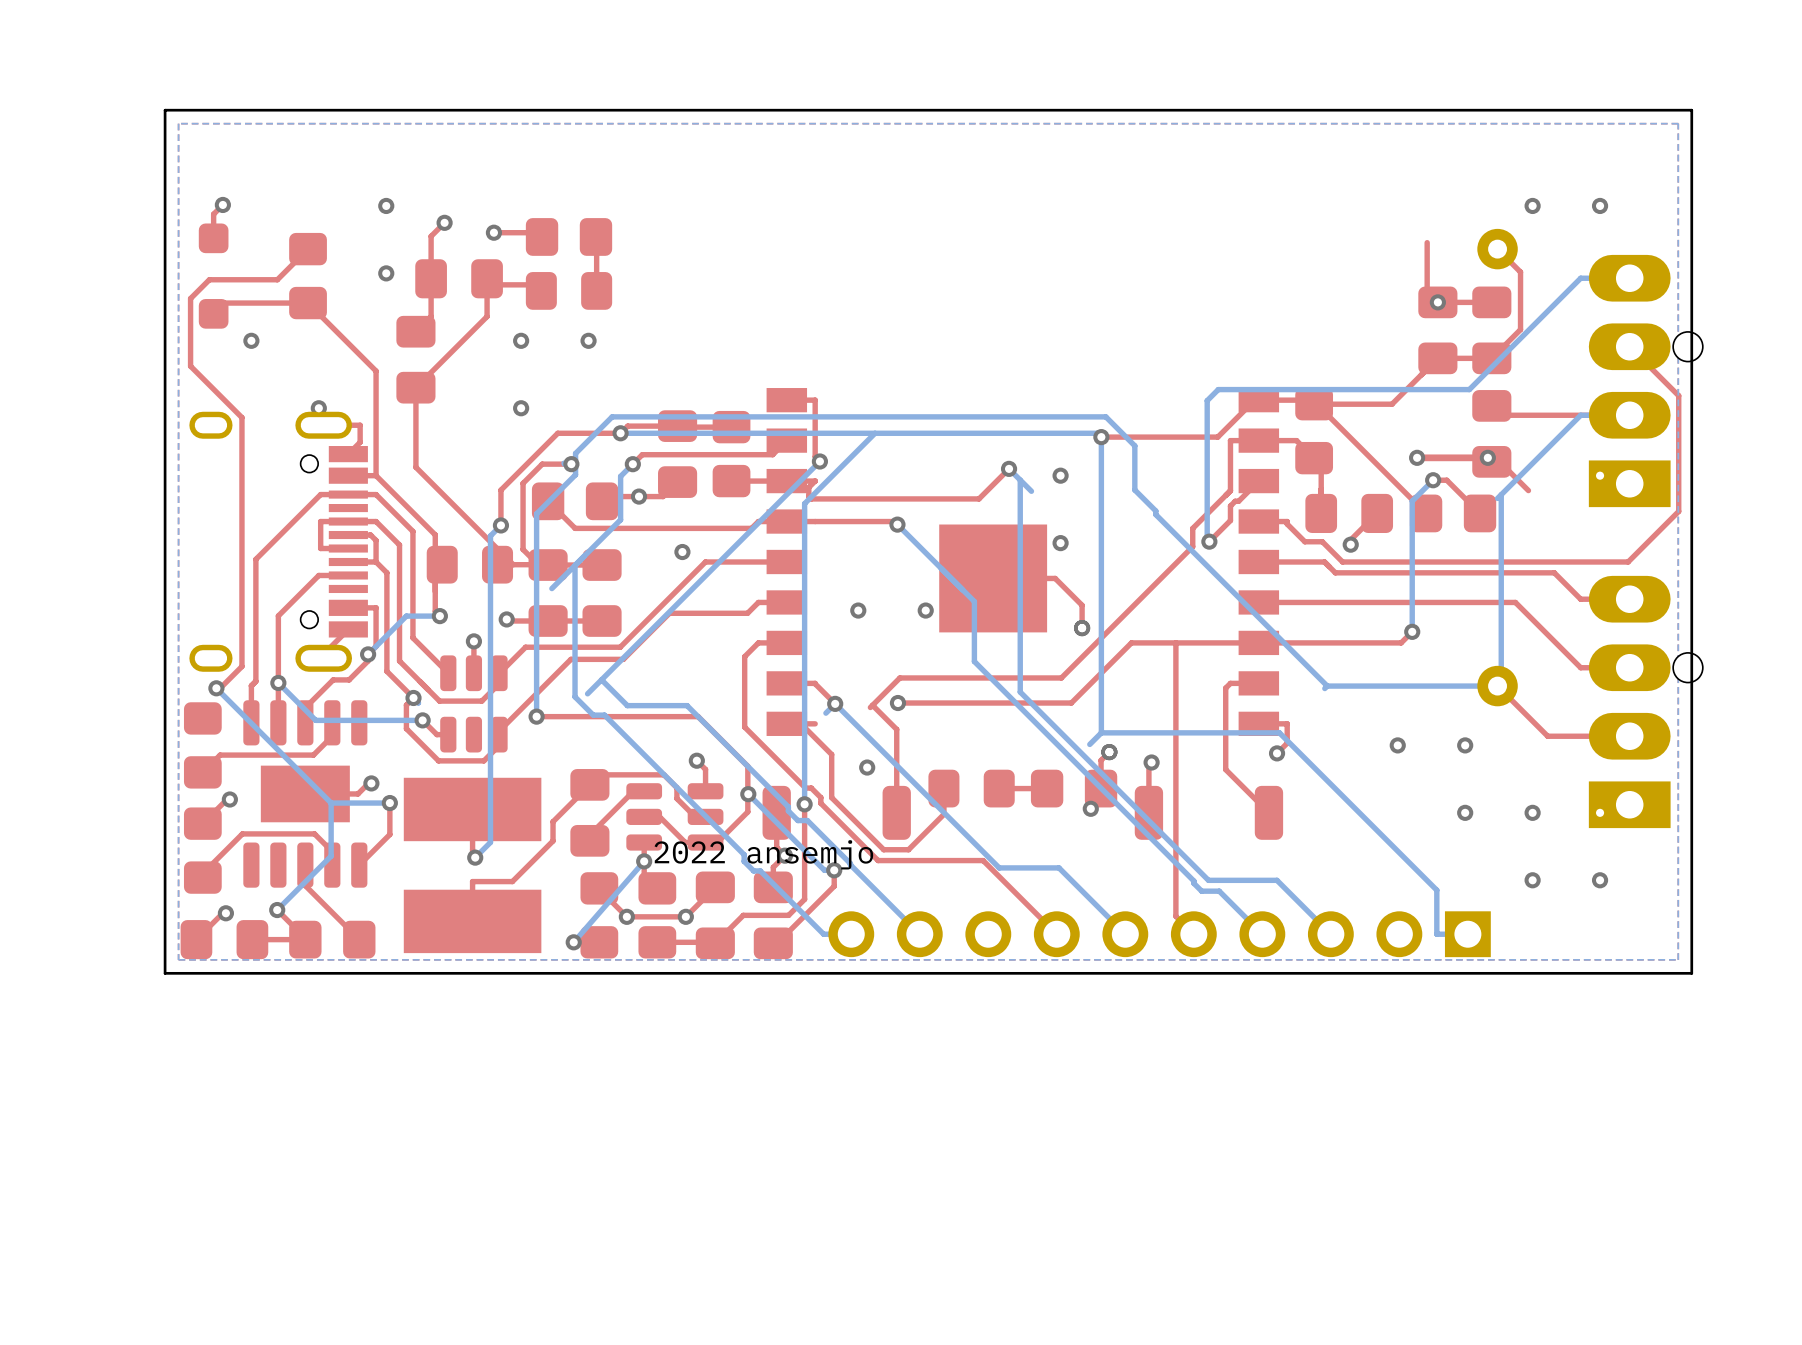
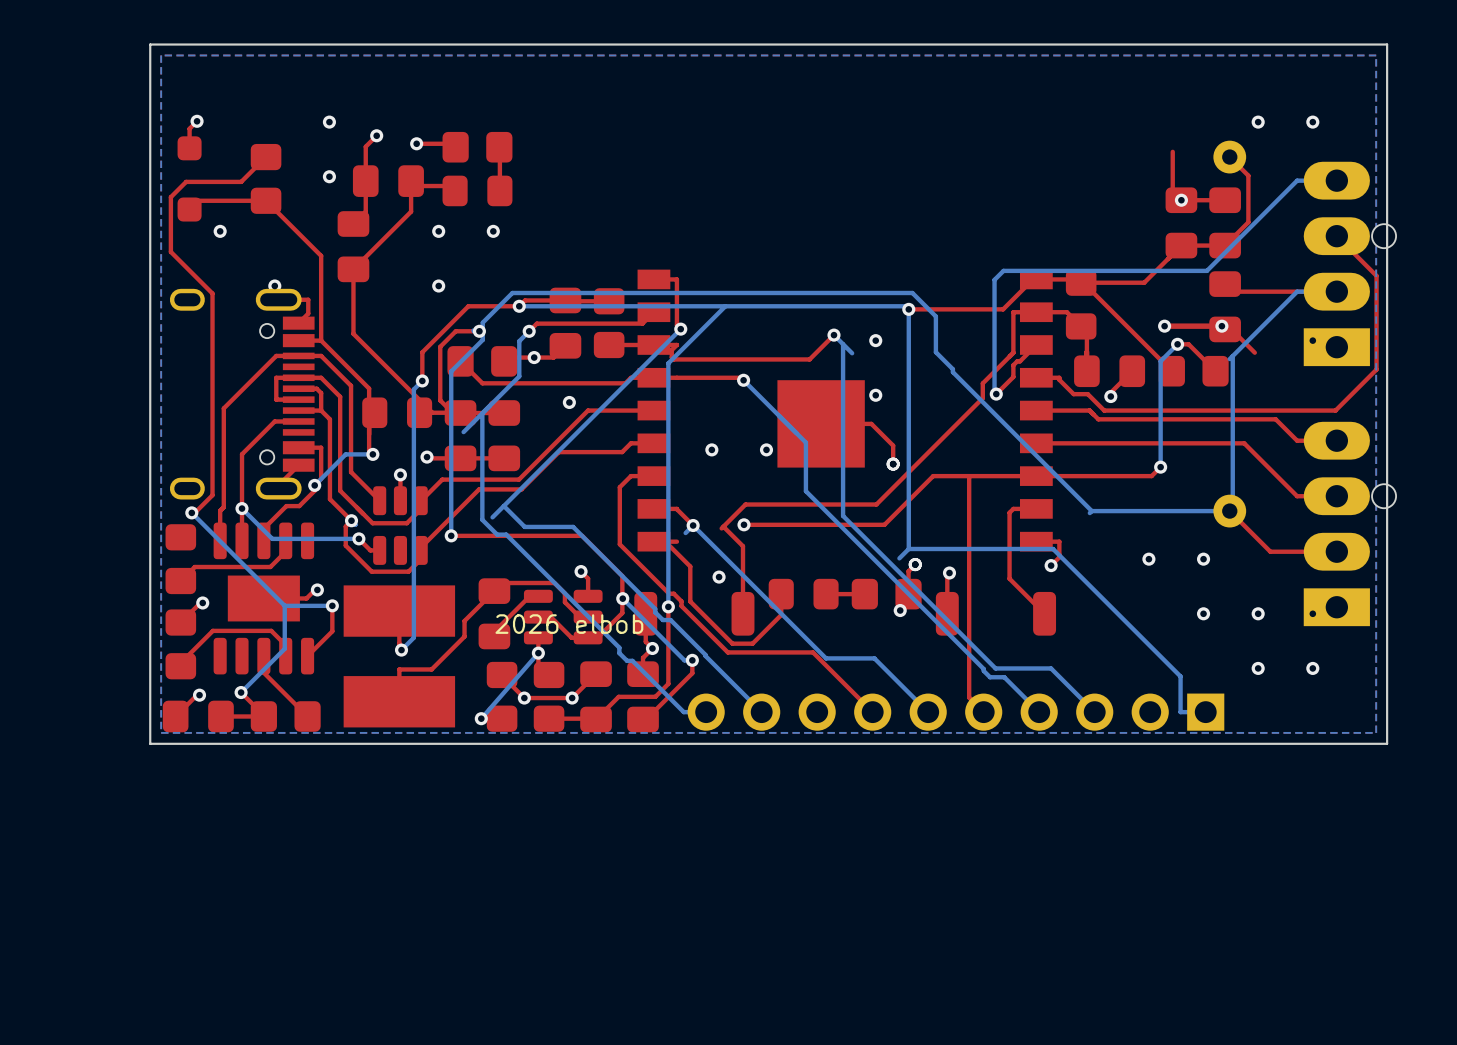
text: none -> 2026 elbob (569, 624)
text: 2022 ansemjo (763, 854) -> none

